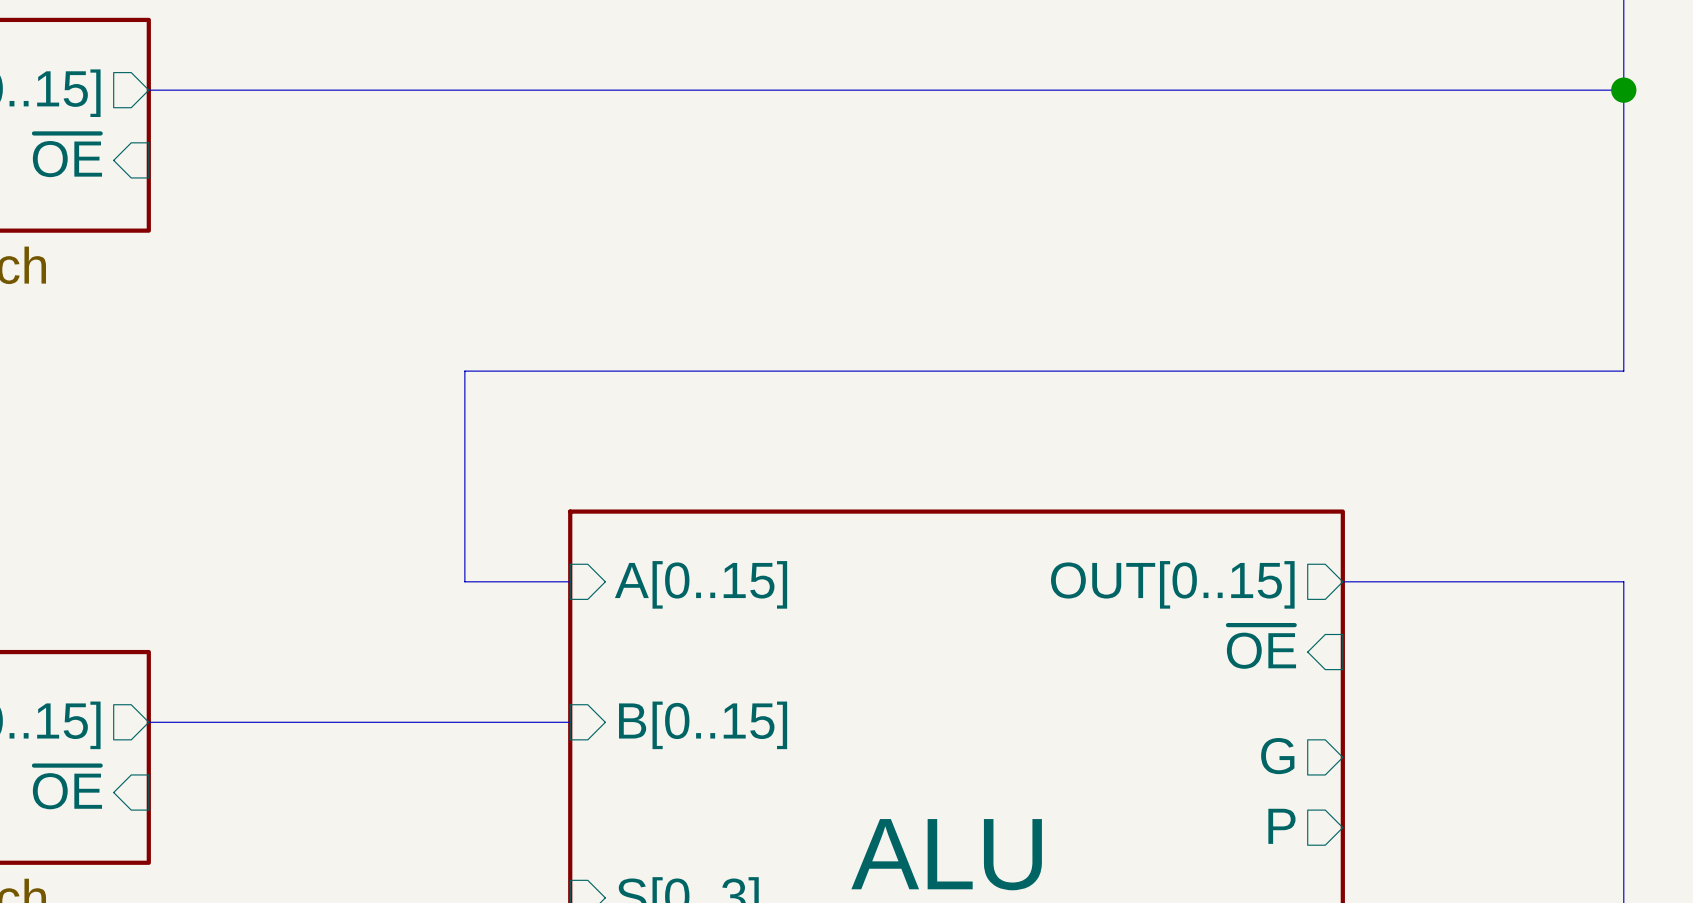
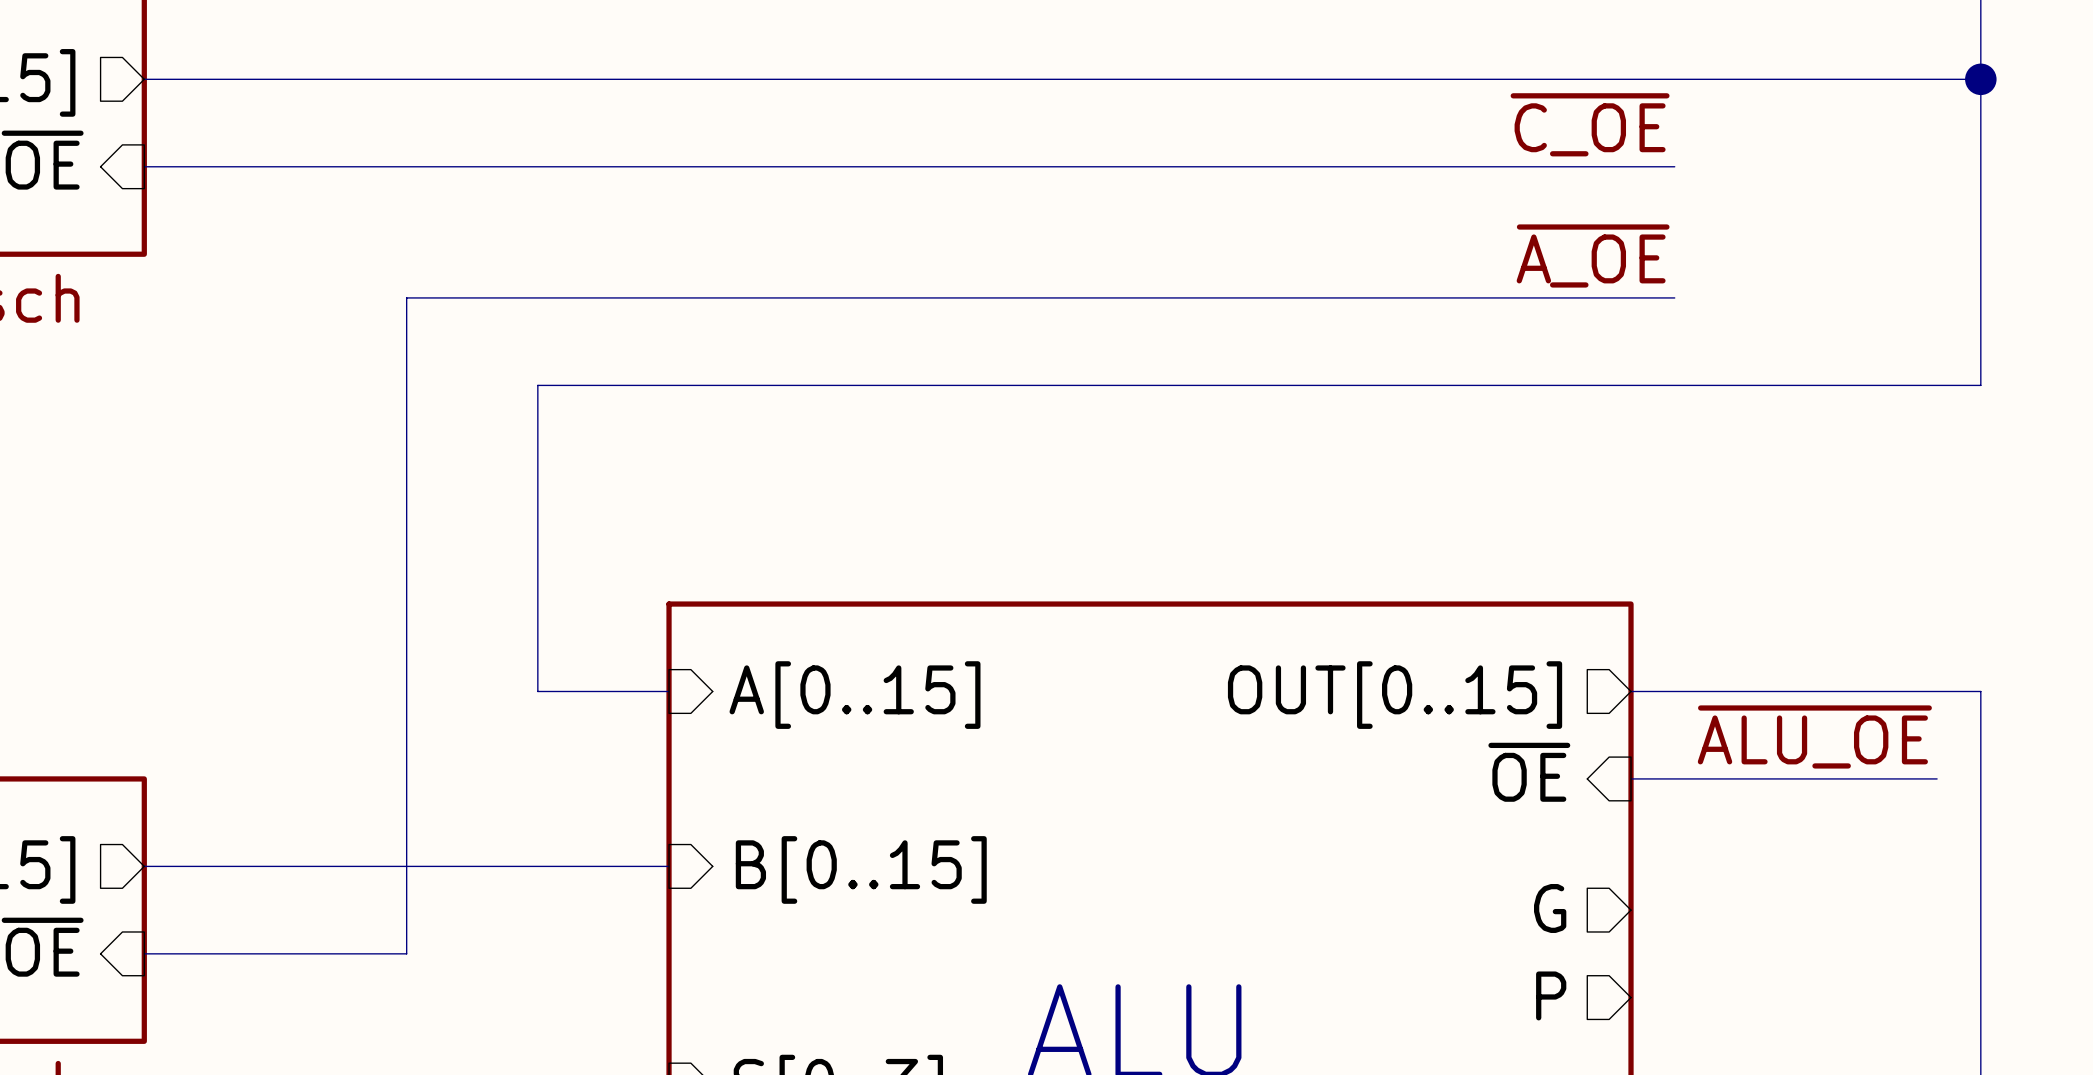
label: none -> ~{C_OE} (1590, 124)
wire: none -> (144, 166) (1674, 166)
label: none -> ~{A_OE} (1593, 255)
wire: none -> (1674, 297) (406, 297) (406, 953) (144, 953)
bus: (1623, 335) (1623, 371) (464, 371) -> (1980, 385) (537, 385) (537, 429)
label: none -> ~{ALU_OE} (1814, 736)
wire: none -> (1631, 778) (1937, 778)

